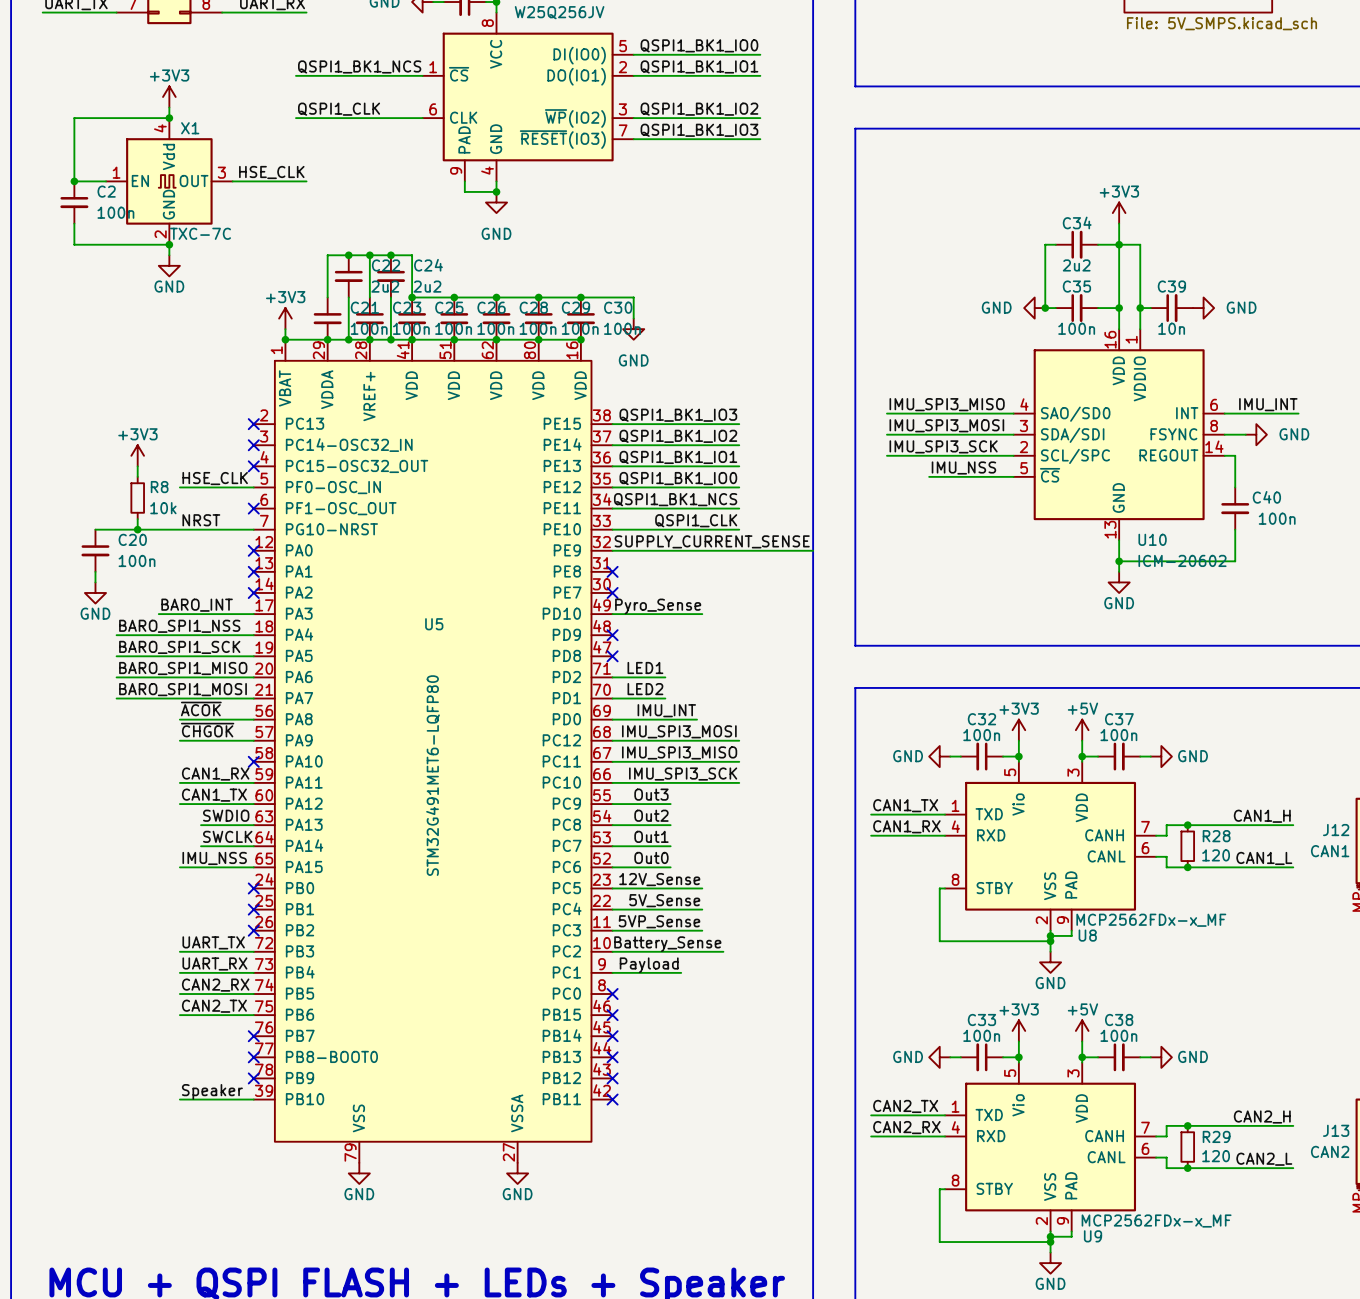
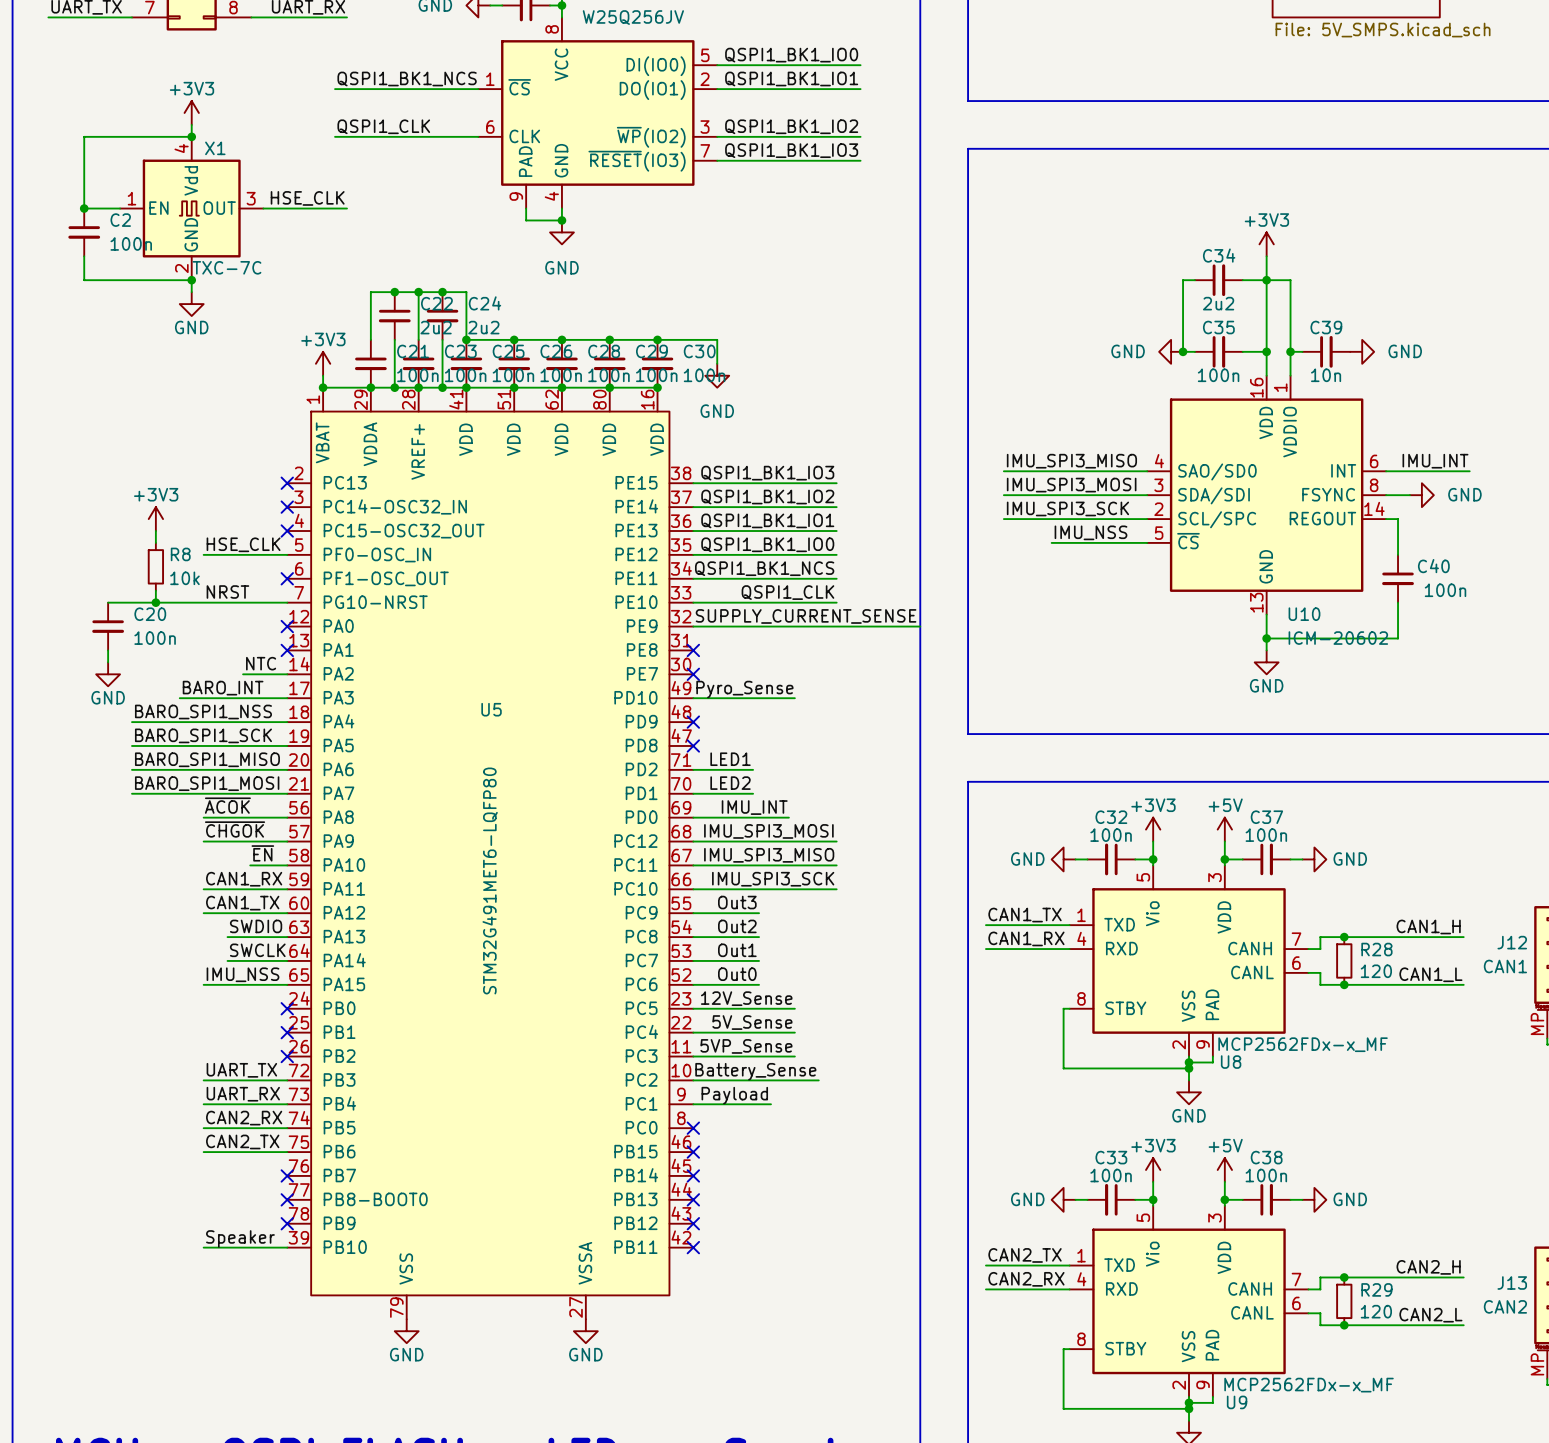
label: none -> NTC (261, 663)
wire: none -> (243, 674) (287, 674)
no-connect mark: (253, 592) -> none
label: none -> ~{EN} (262, 853)
wire: none -> (250, 865) (287, 865)
no-connect mark: (253, 761) -> none

